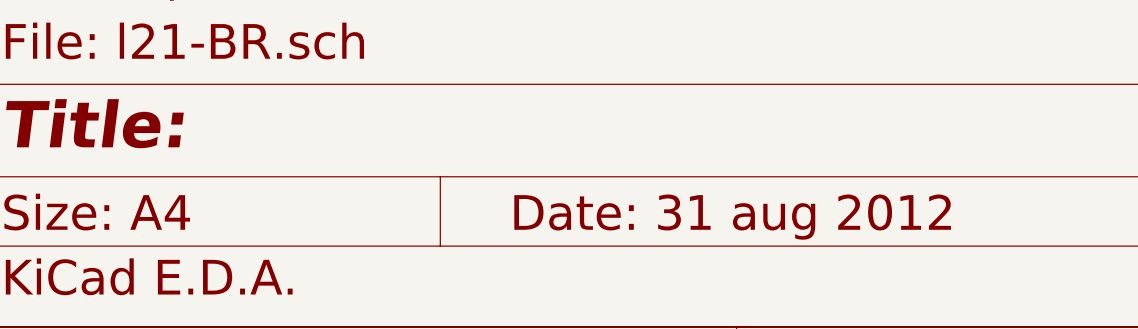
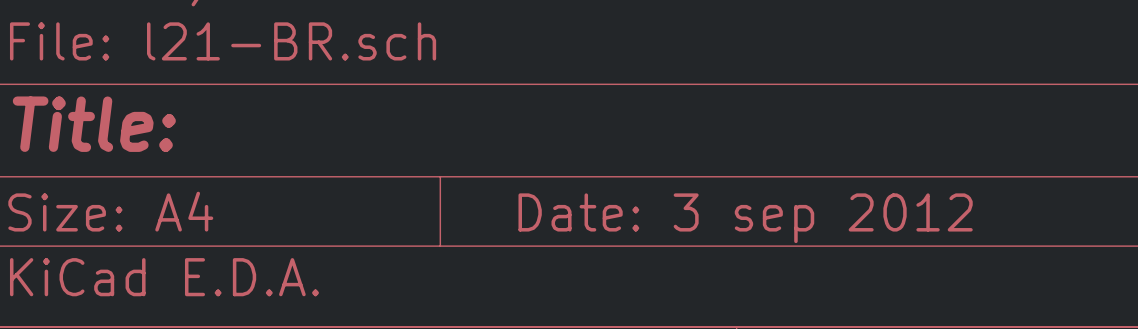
title block: Date: 31 aug 2012 (732, 217) -> Date: 3 sep 2012 (745, 218)

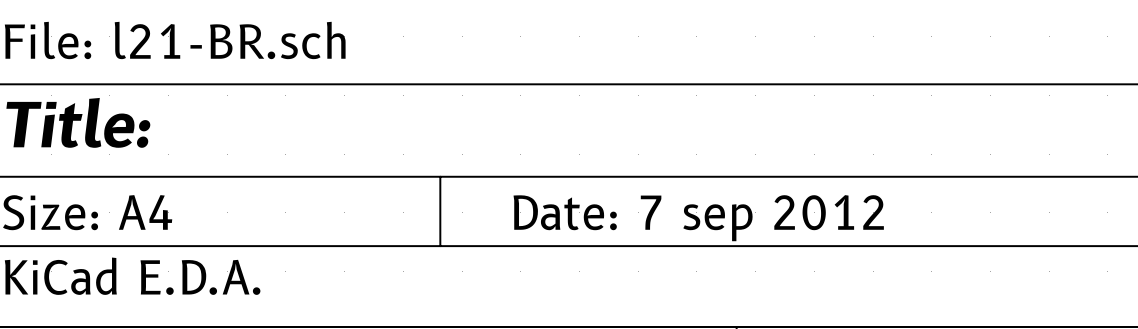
title block: Date: 3 sep 2012 (745, 218) -> Date: 7 sep 2012 (698, 218)

